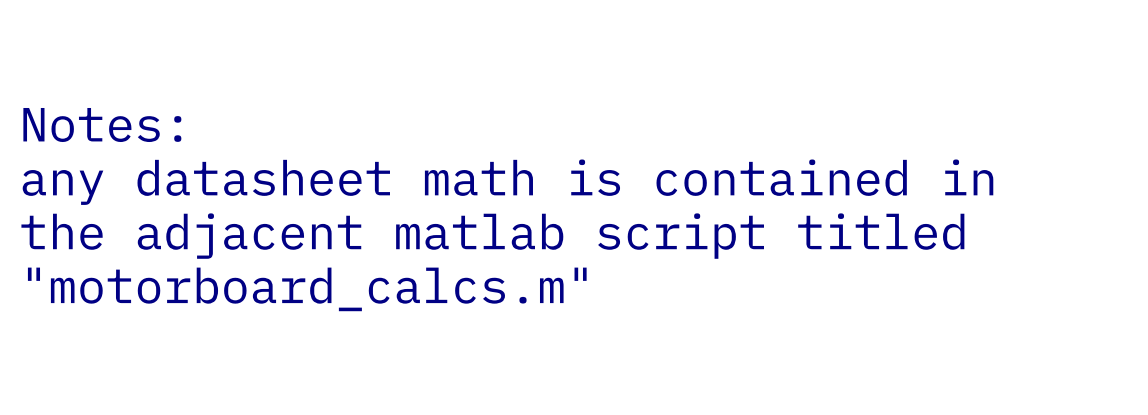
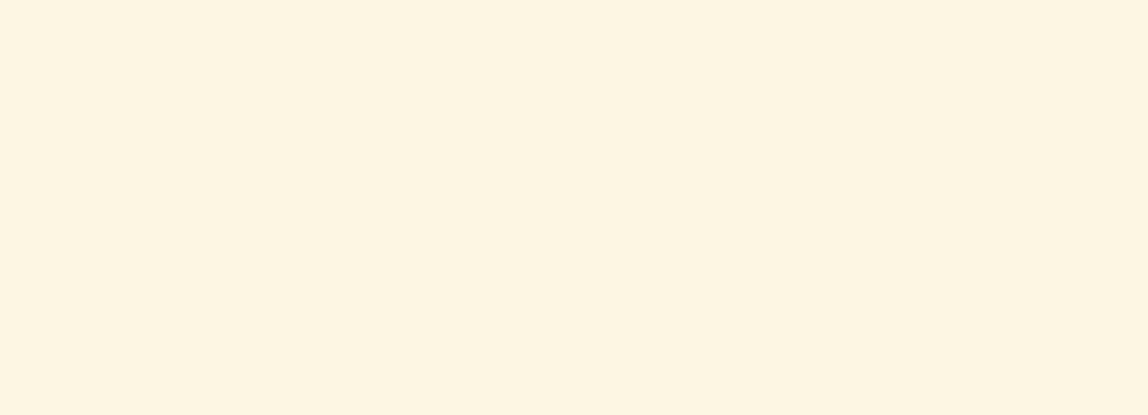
text: Notes: (102, 125) -> none
text: any datasheet math is contained in (507, 182) -> none
text: the adjacent matlab script titled (492, 236) -> none
text: "motorboard_calcs.m" (307, 289) -> none

